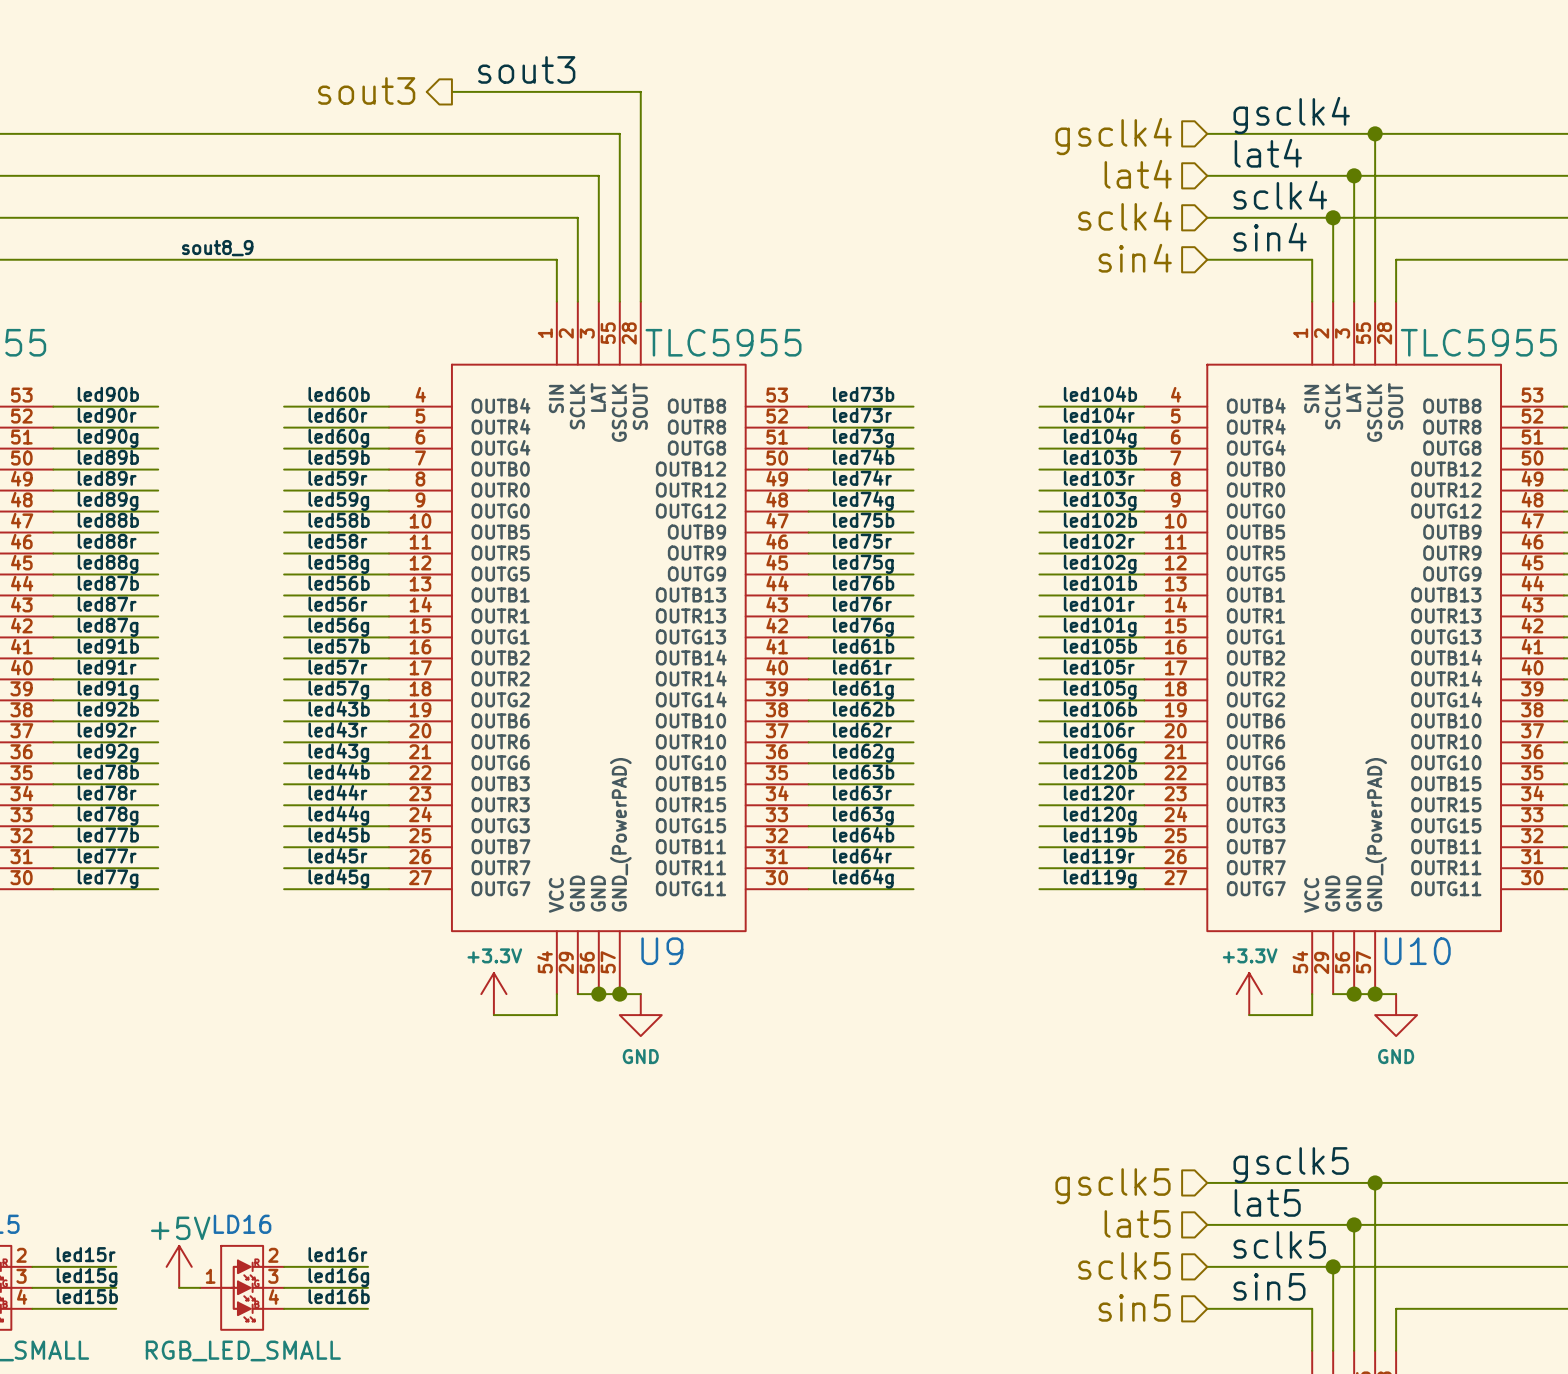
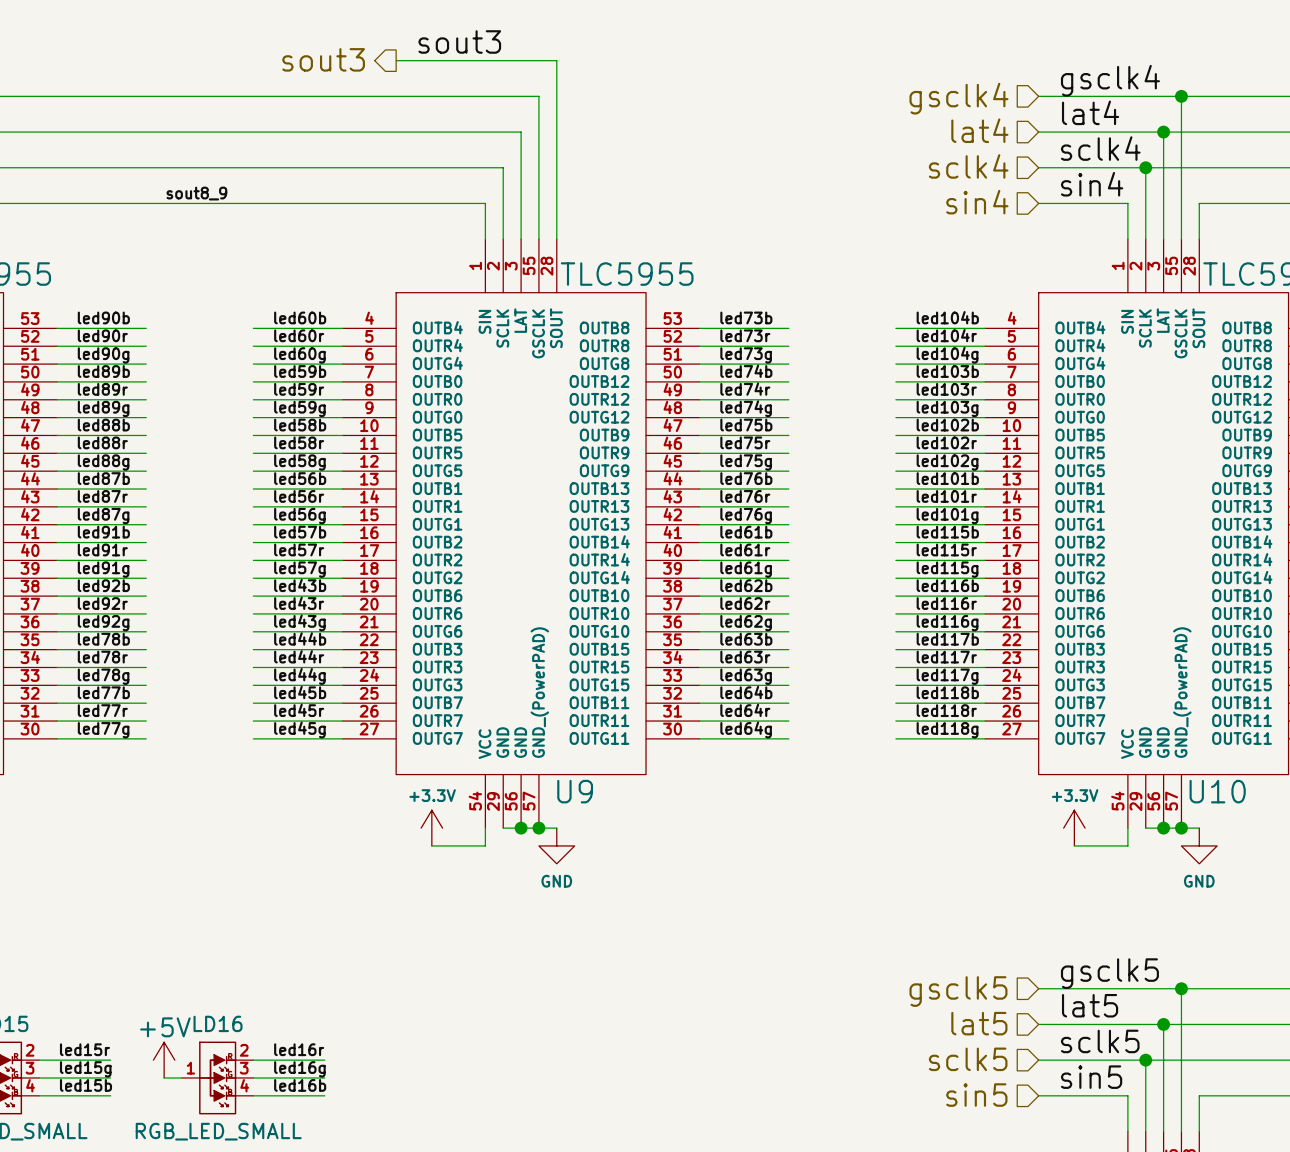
label: led105b (1100, 646) -> led115b (947, 532)
label: led105r (1099, 667) -> led115r (946, 549)
label: led105g (1100, 690) -> led115g (947, 569)
label: led106b (1100, 709) -> led116b (947, 585)
label: led106r (1099, 730) -> led116r (946, 603)
label: led106g (1100, 753) -> led116g (947, 623)
label: led120b (1100, 772) -> led117b (947, 639)
label: led120r (1099, 793) -> led117r (946, 657)
label: led120g (1100, 816) -> led117g (947, 676)
label: led119b (1100, 835) -> led118b (947, 692)
label: led119r (1099, 855) -> led118r (946, 710)
label: led119g (1100, 879) -> led118g (947, 730)

